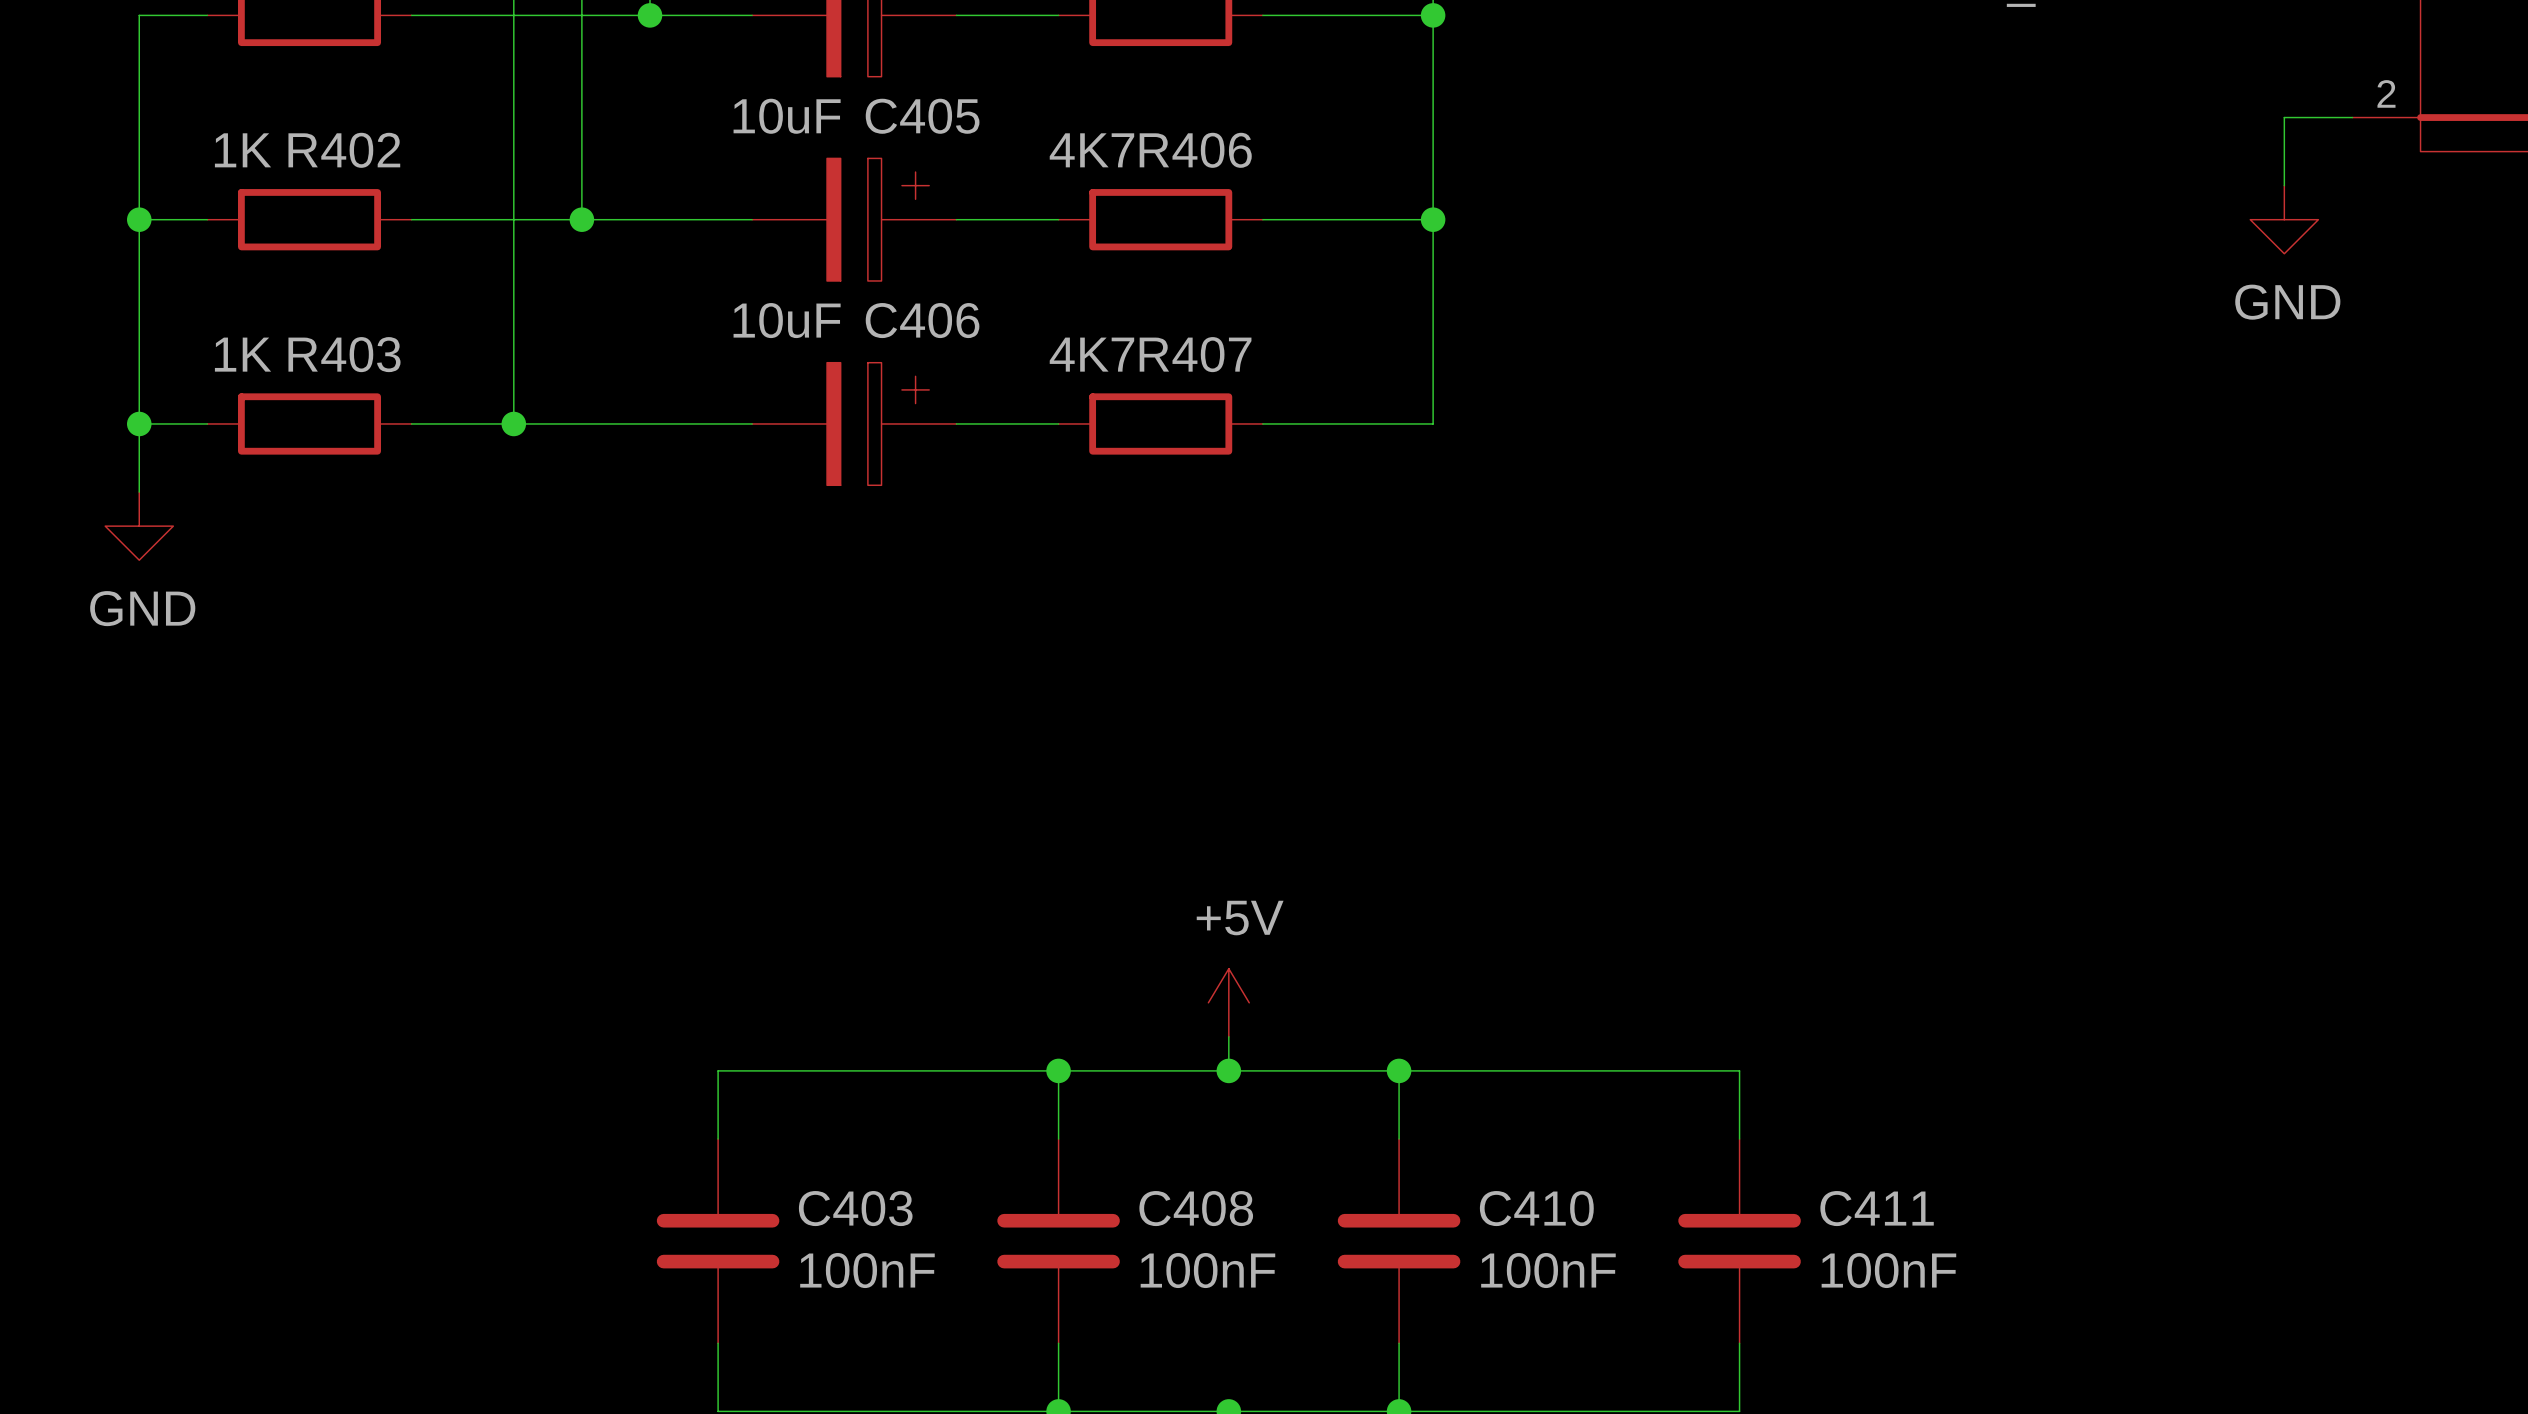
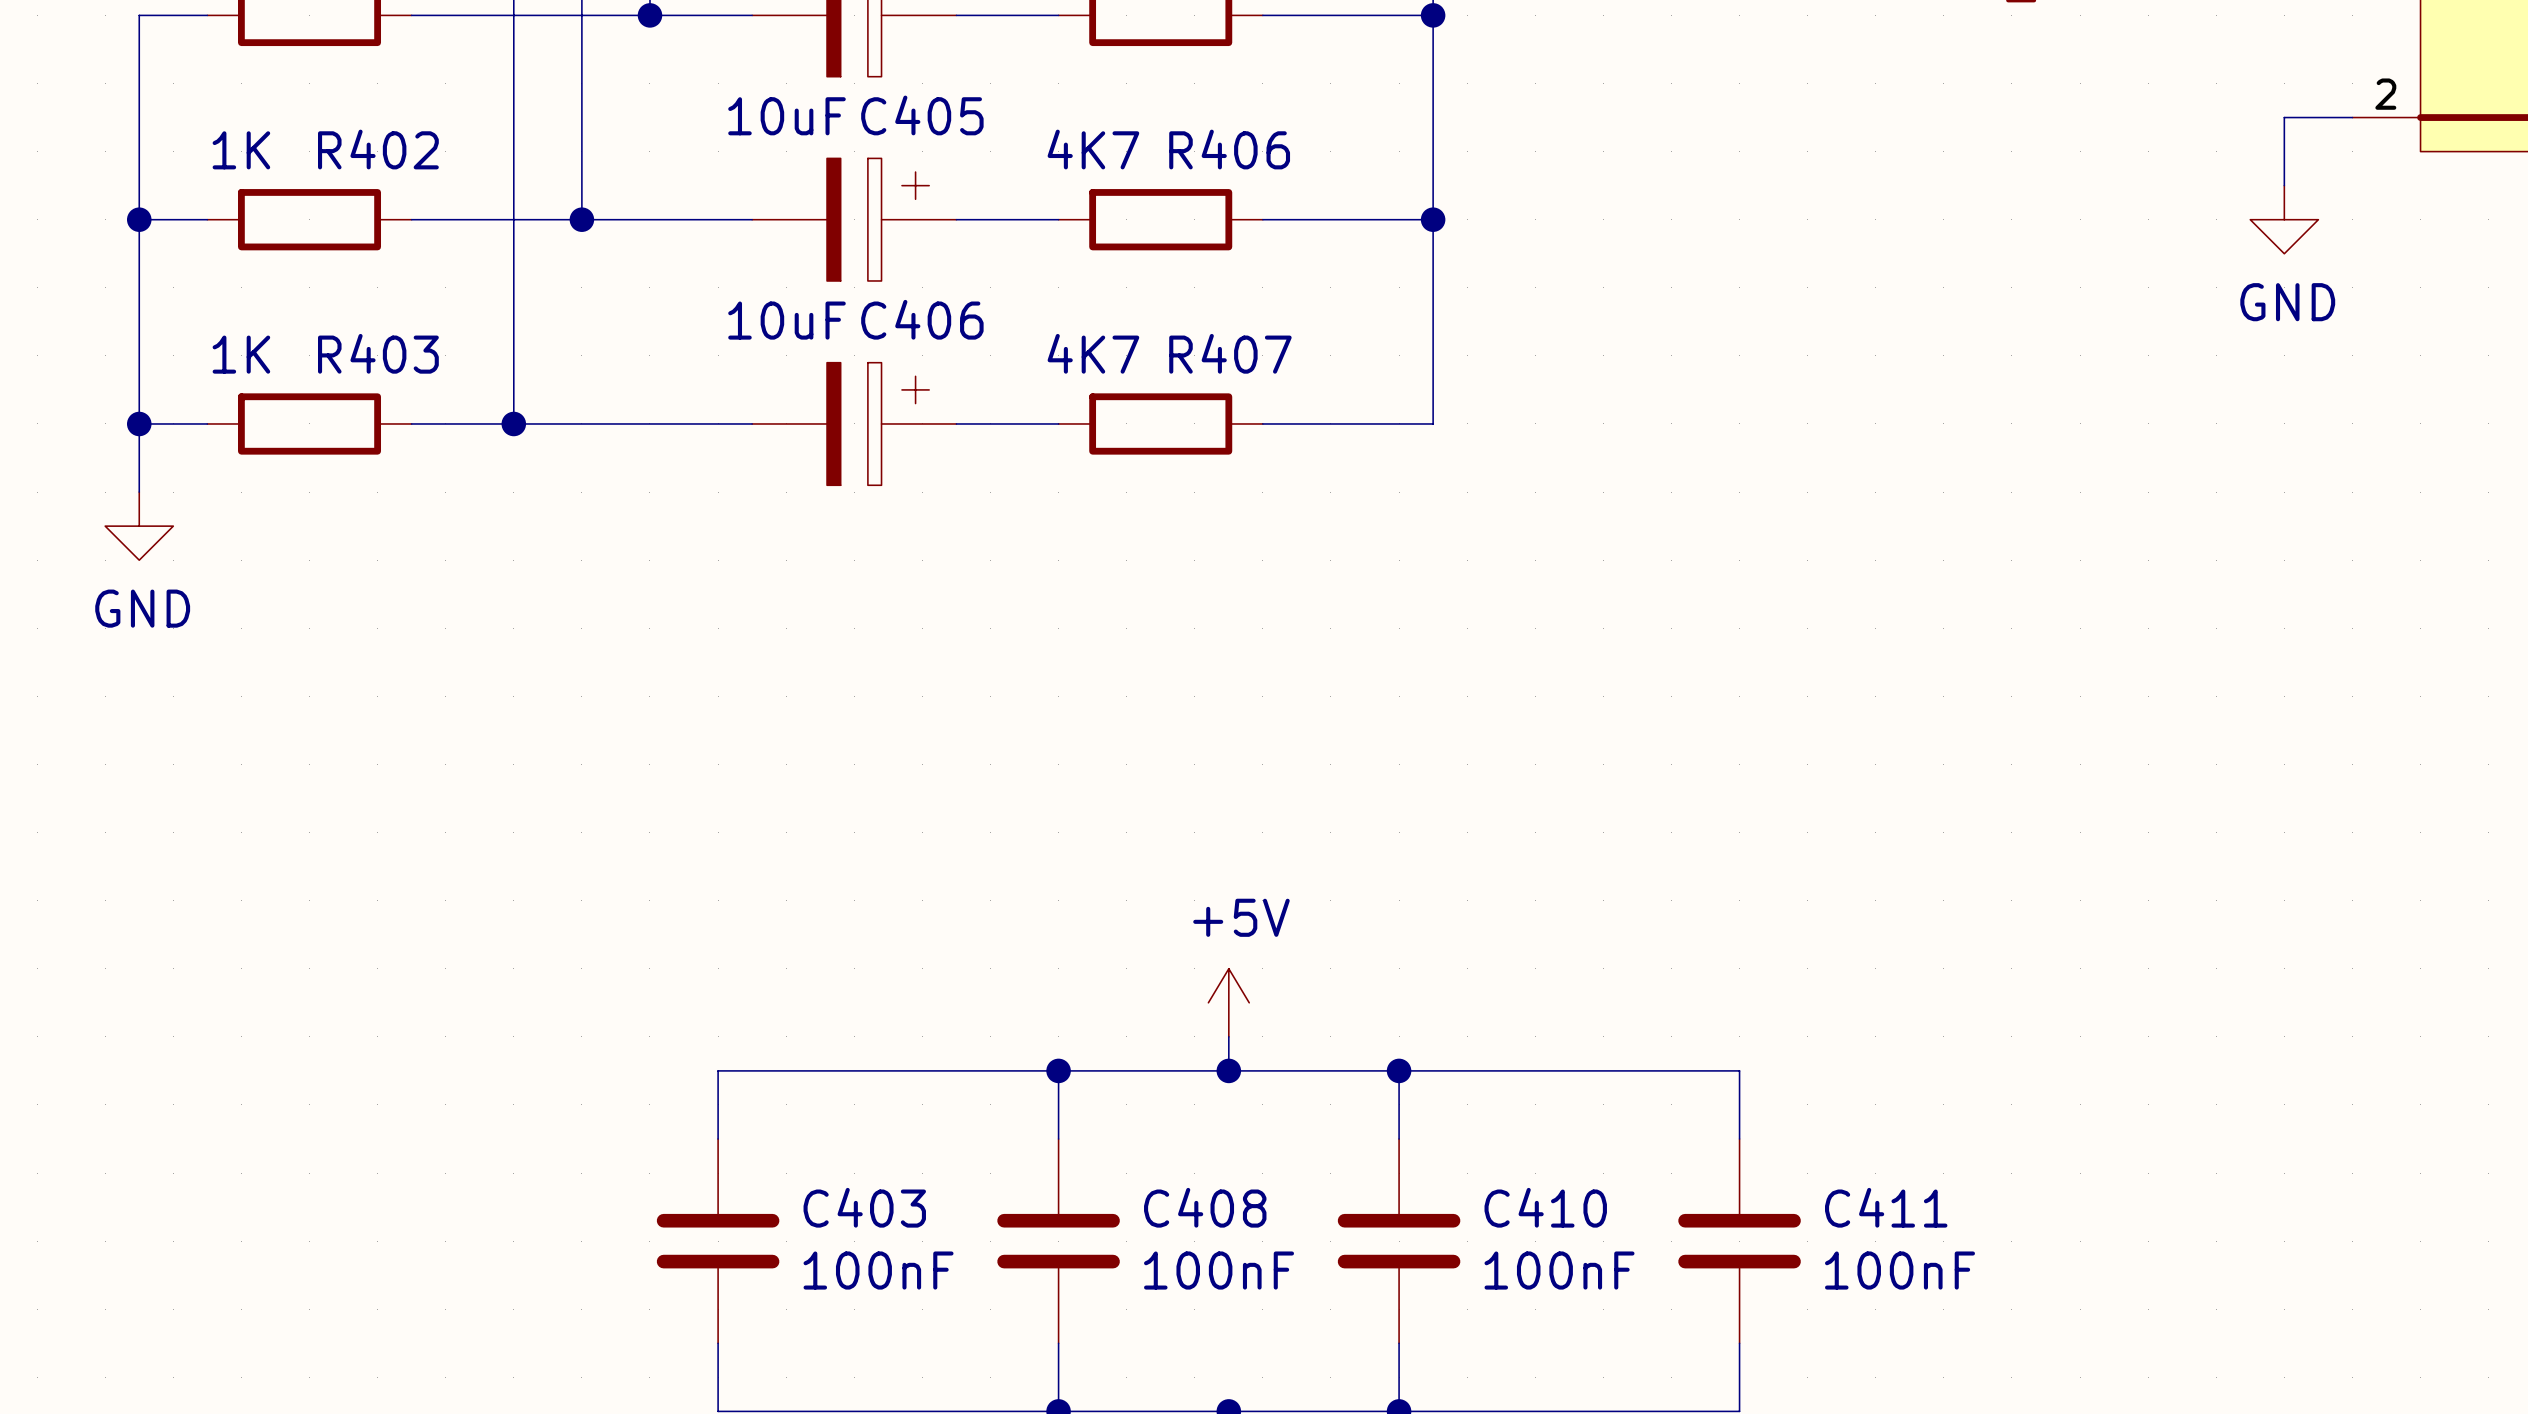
R402 name position: R402 (344, 150) -> R402 (378, 149)
R406 name position: R406 (1195, 150) -> R406 (1229, 149)
R403 name position: R403 (344, 354) -> R403 (378, 353)
R407 name position: R407 (1195, 354) -> R407 (1230, 353)

